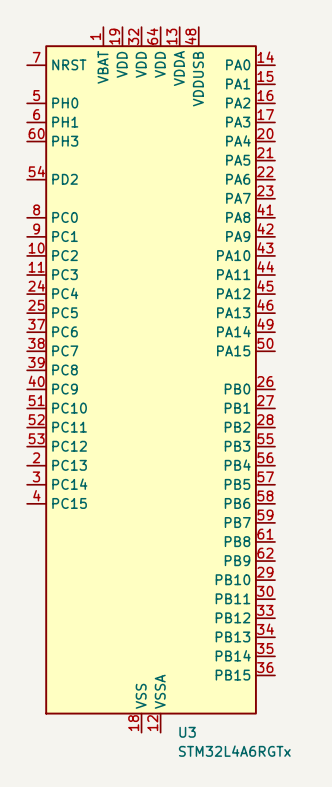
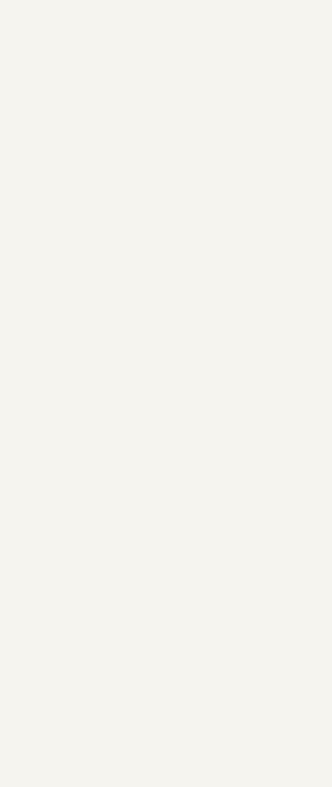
U3: STM32L4A6RGTx (151, 379) -> none

